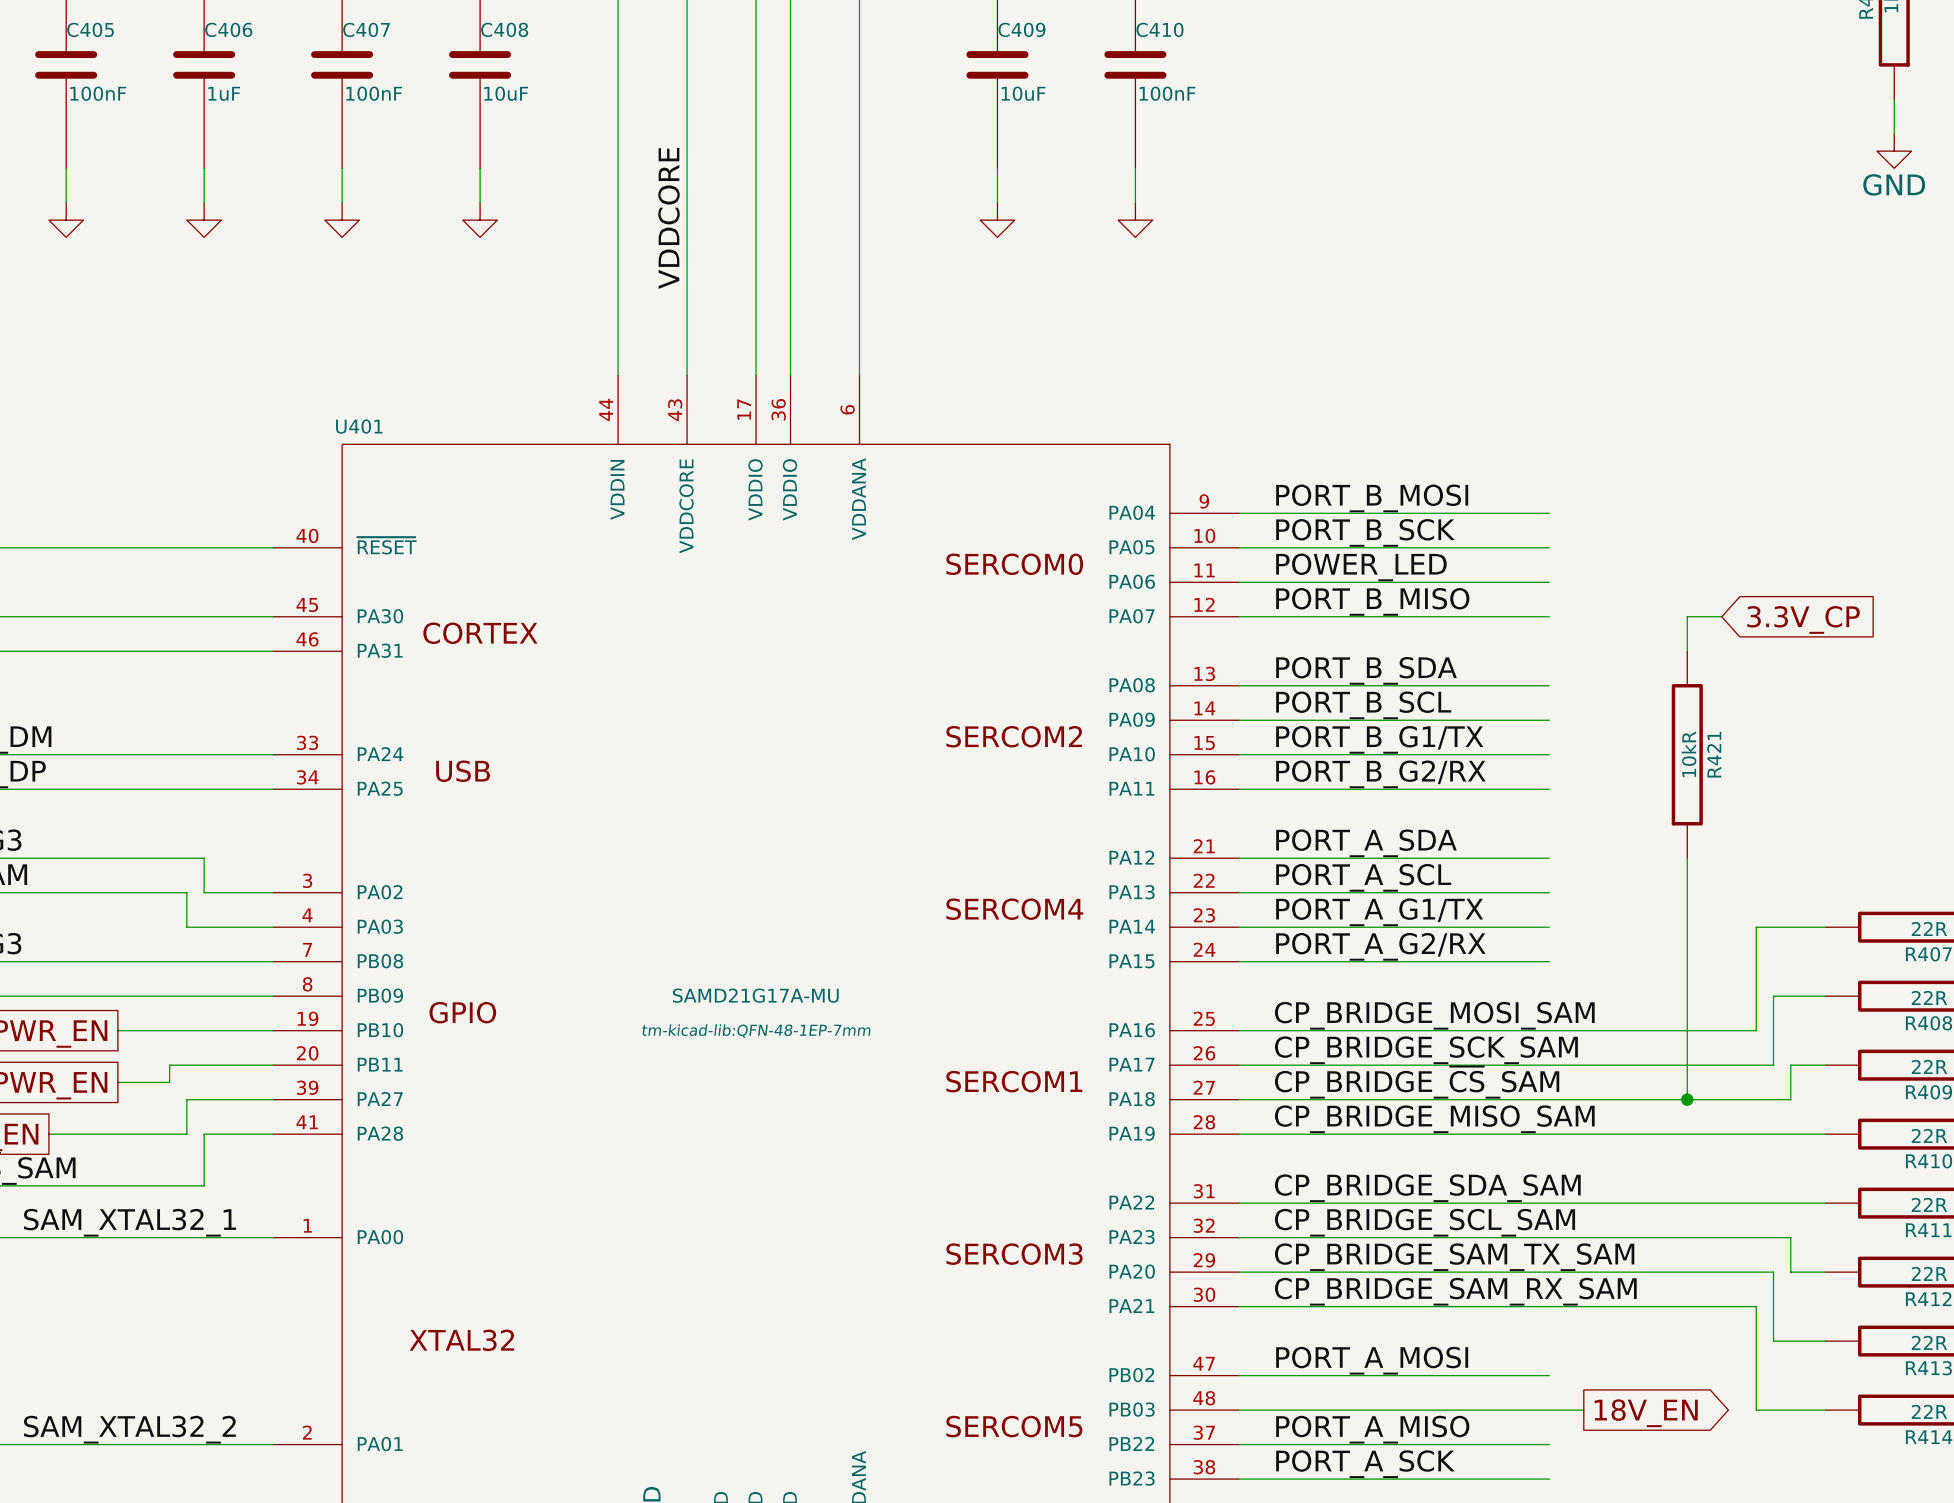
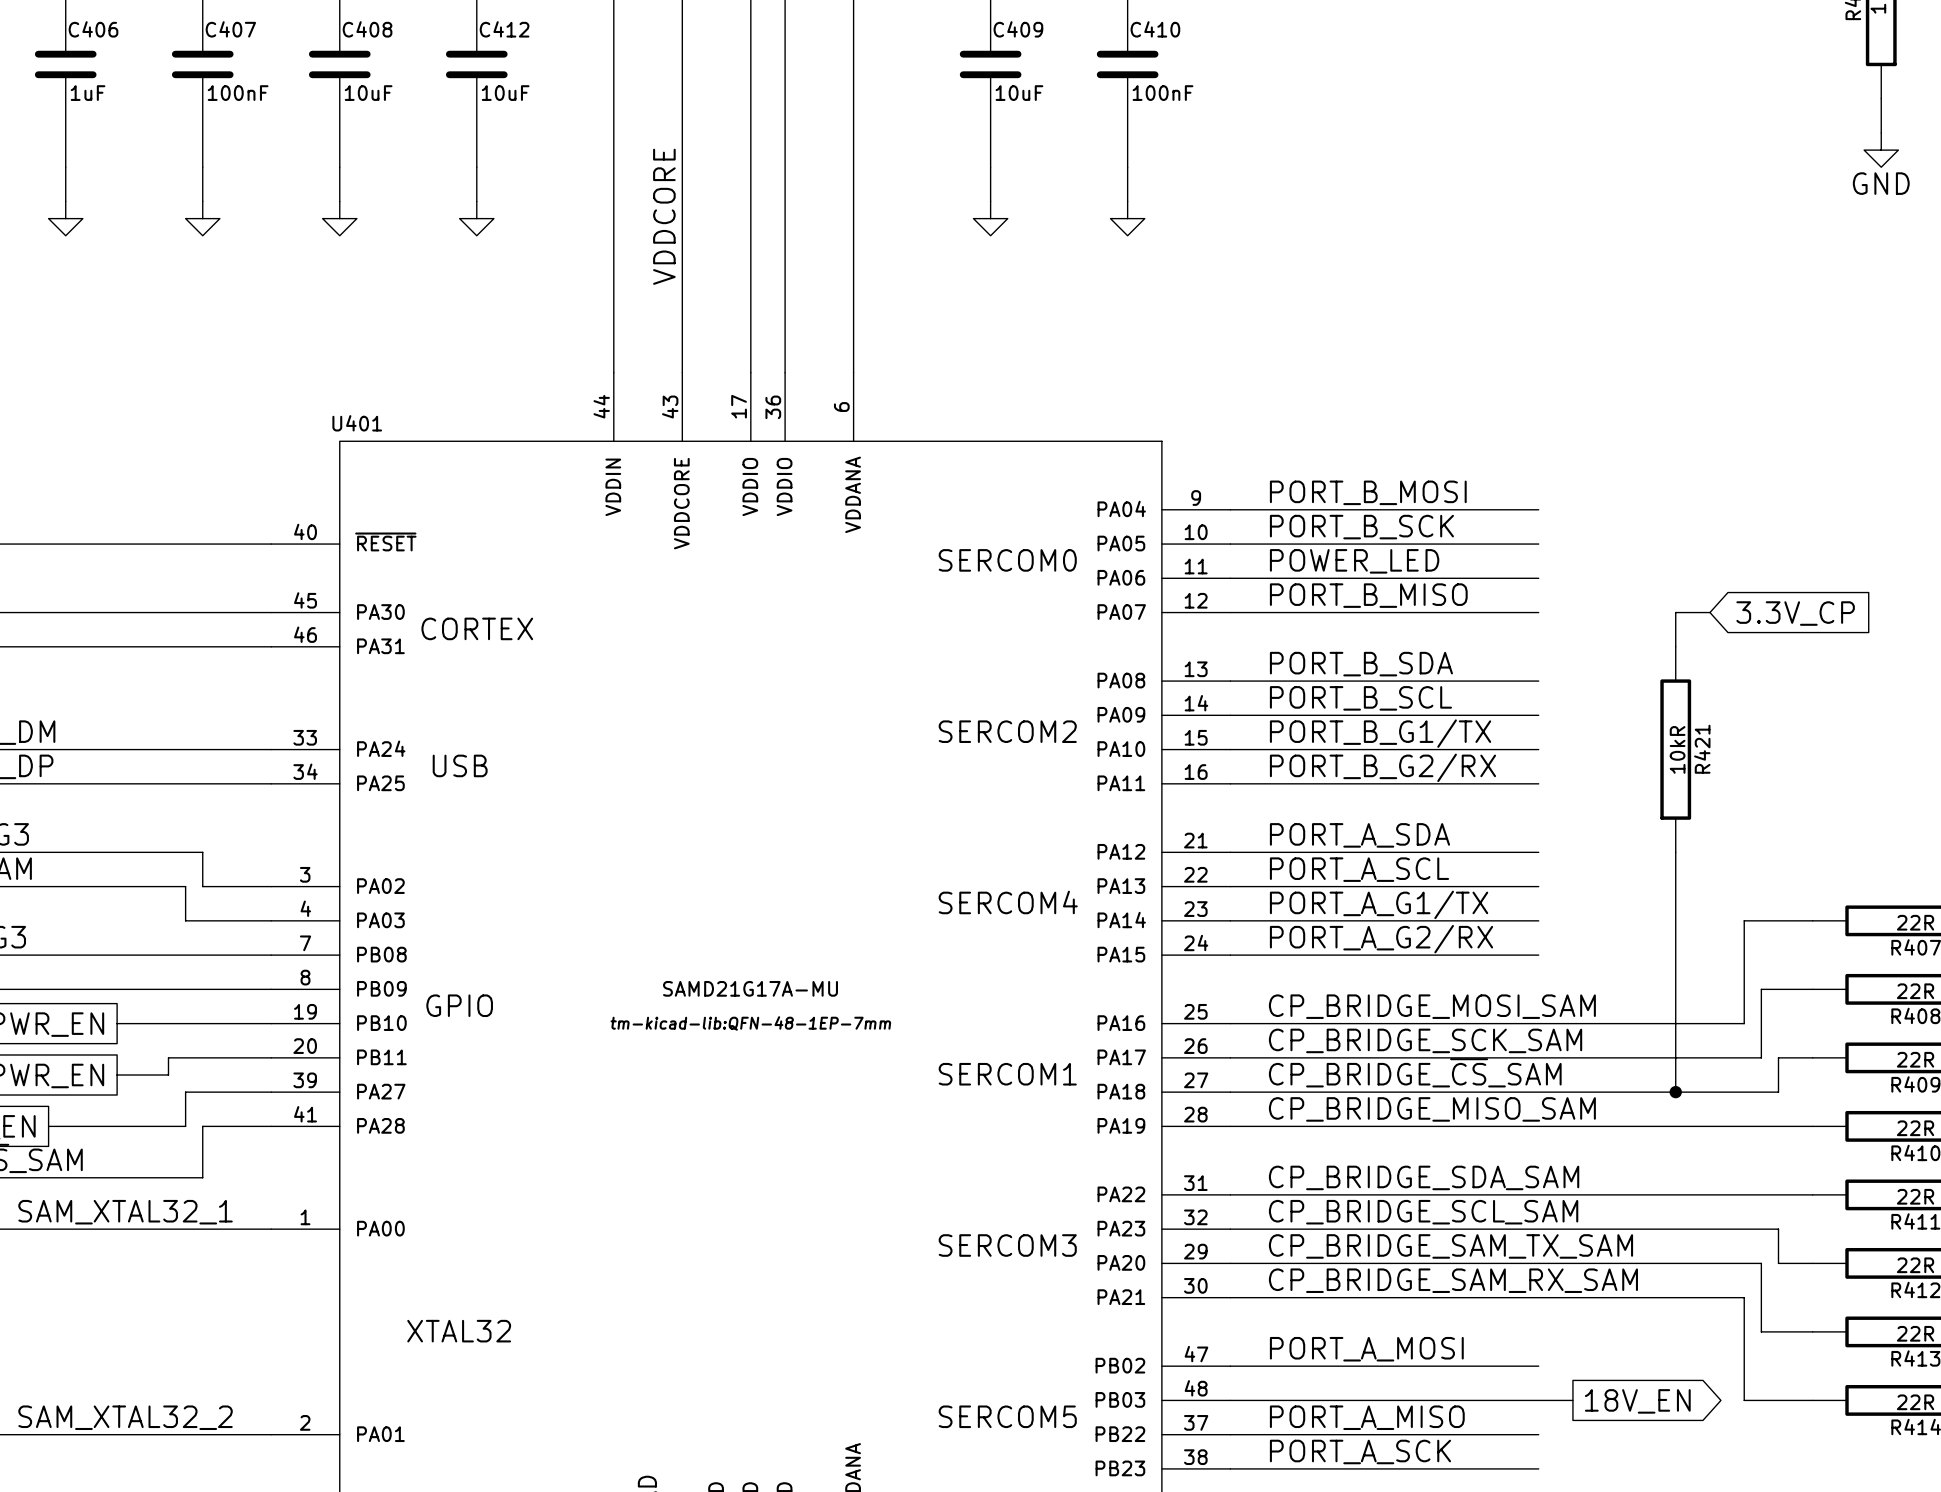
C405 name: C405 (90, 29) -> C406 (93, 29)
C406 name: C406 (228, 29) -> C407 (230, 29)
C407 name: C407 (366, 29) -> C408 (367, 29)
C408 name: C408 (504, 29) -> C412 (504, 29)
C405 value: 100nF (98, 93) -> 1uF (88, 93)
C406 value: 1uF (224, 93) -> 100nF (238, 93)
C407 value: 100nF (374, 93) -> 10uF (368, 93)

